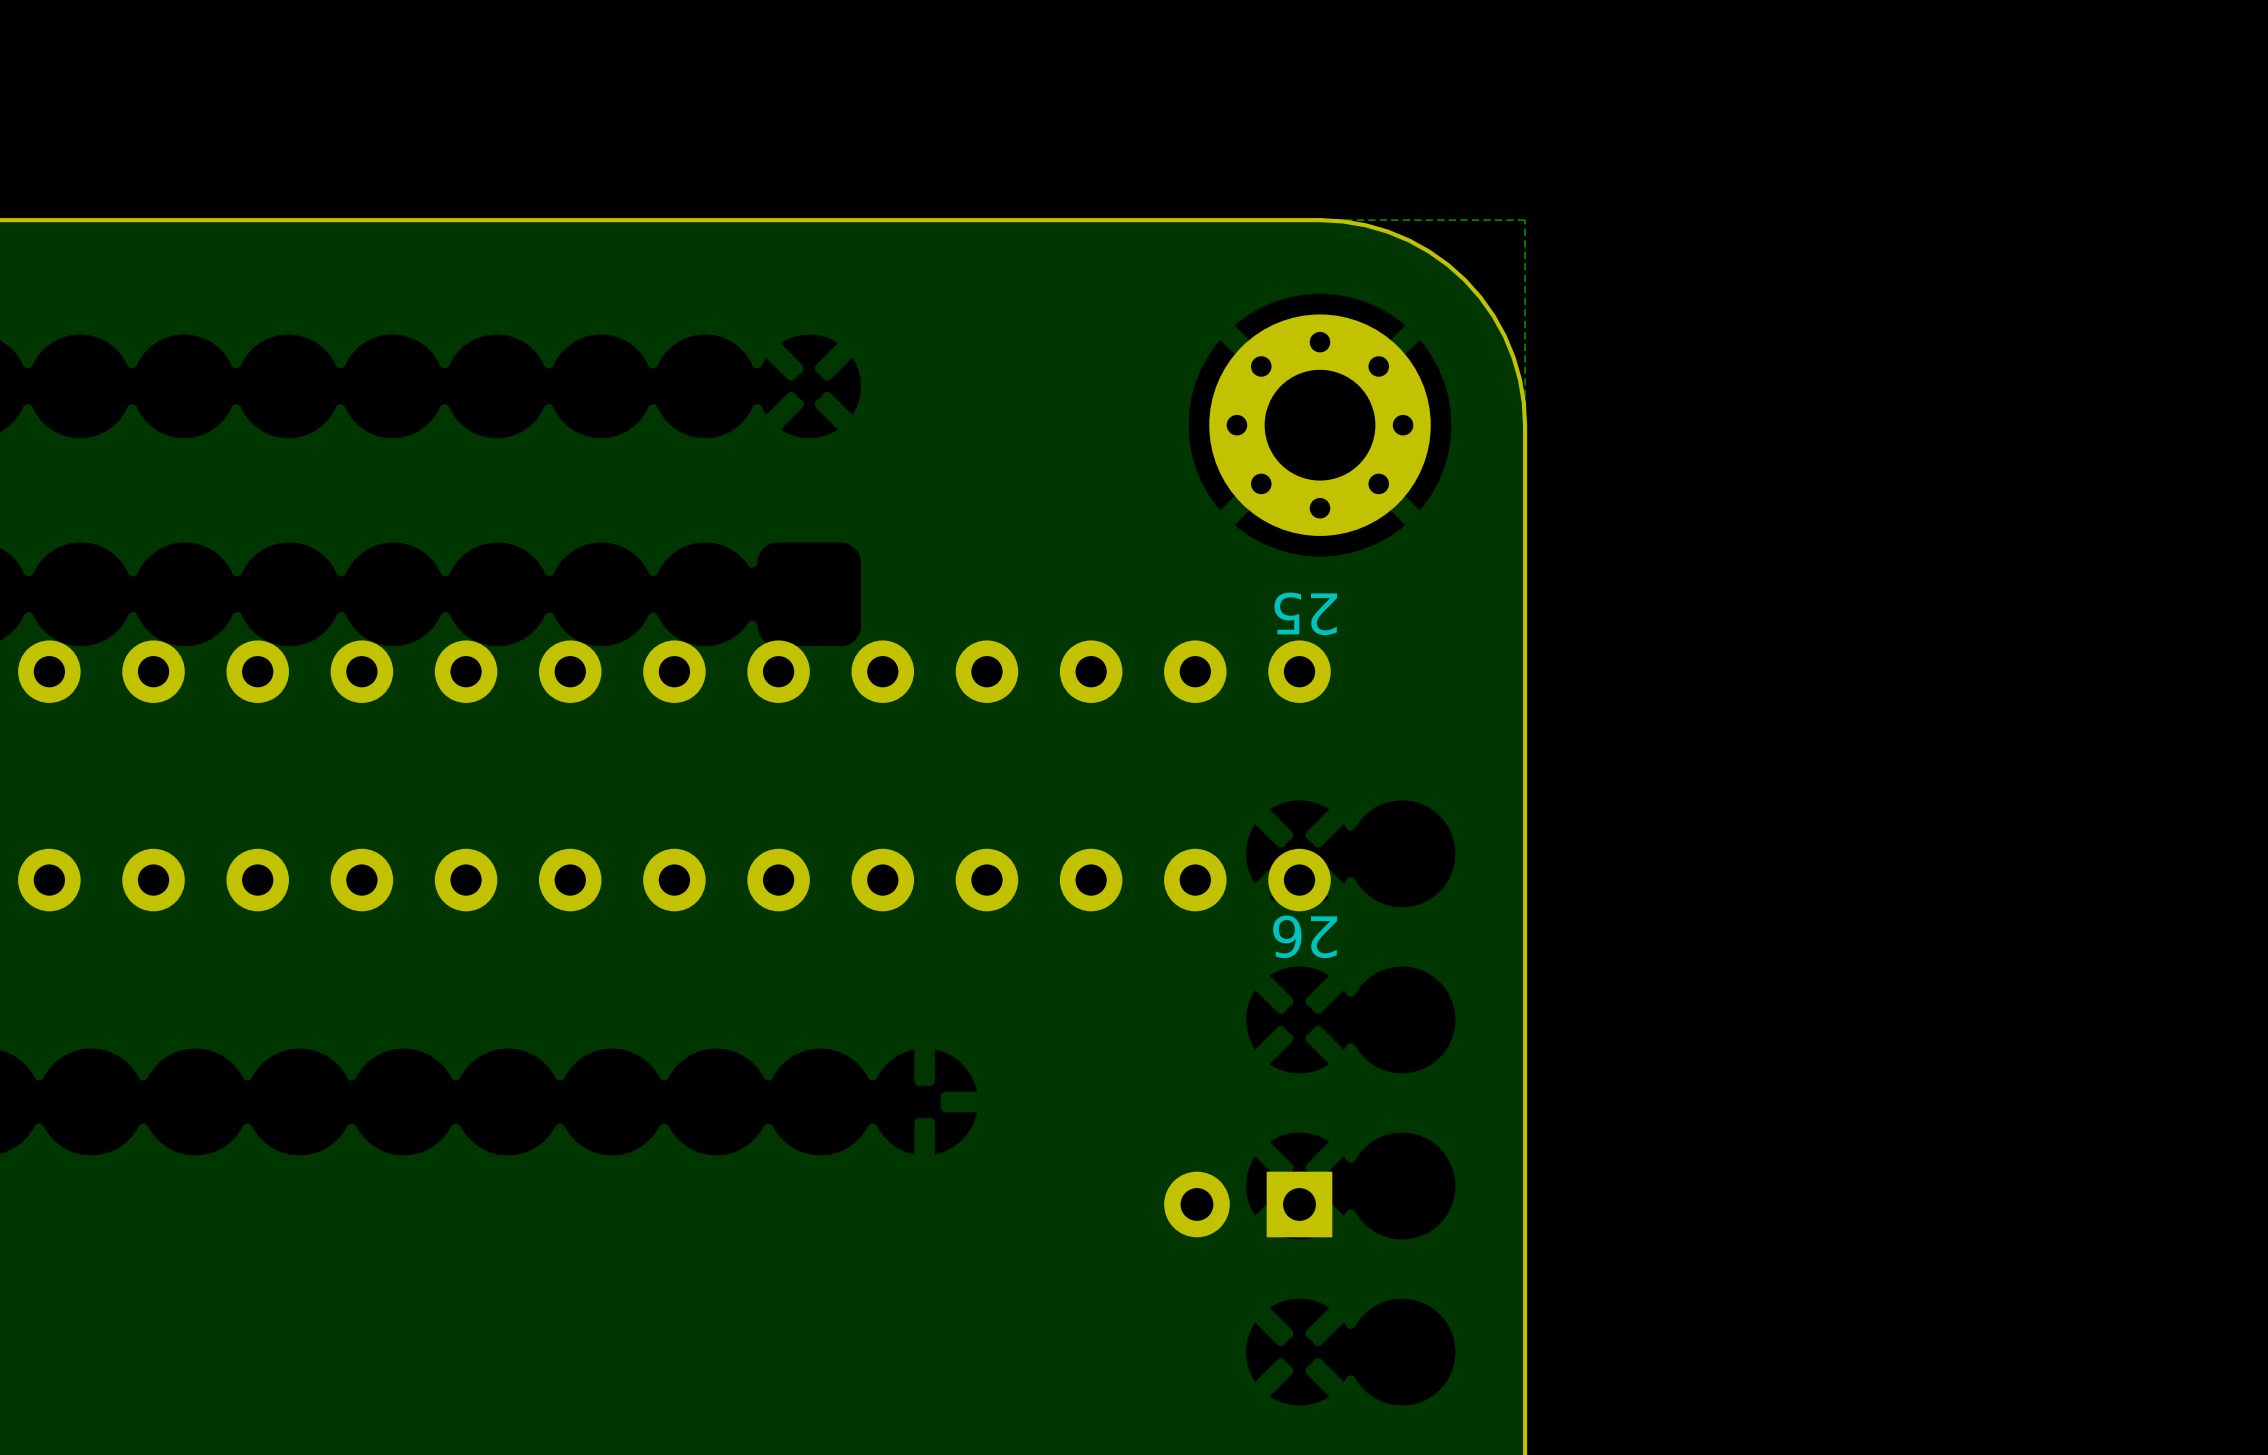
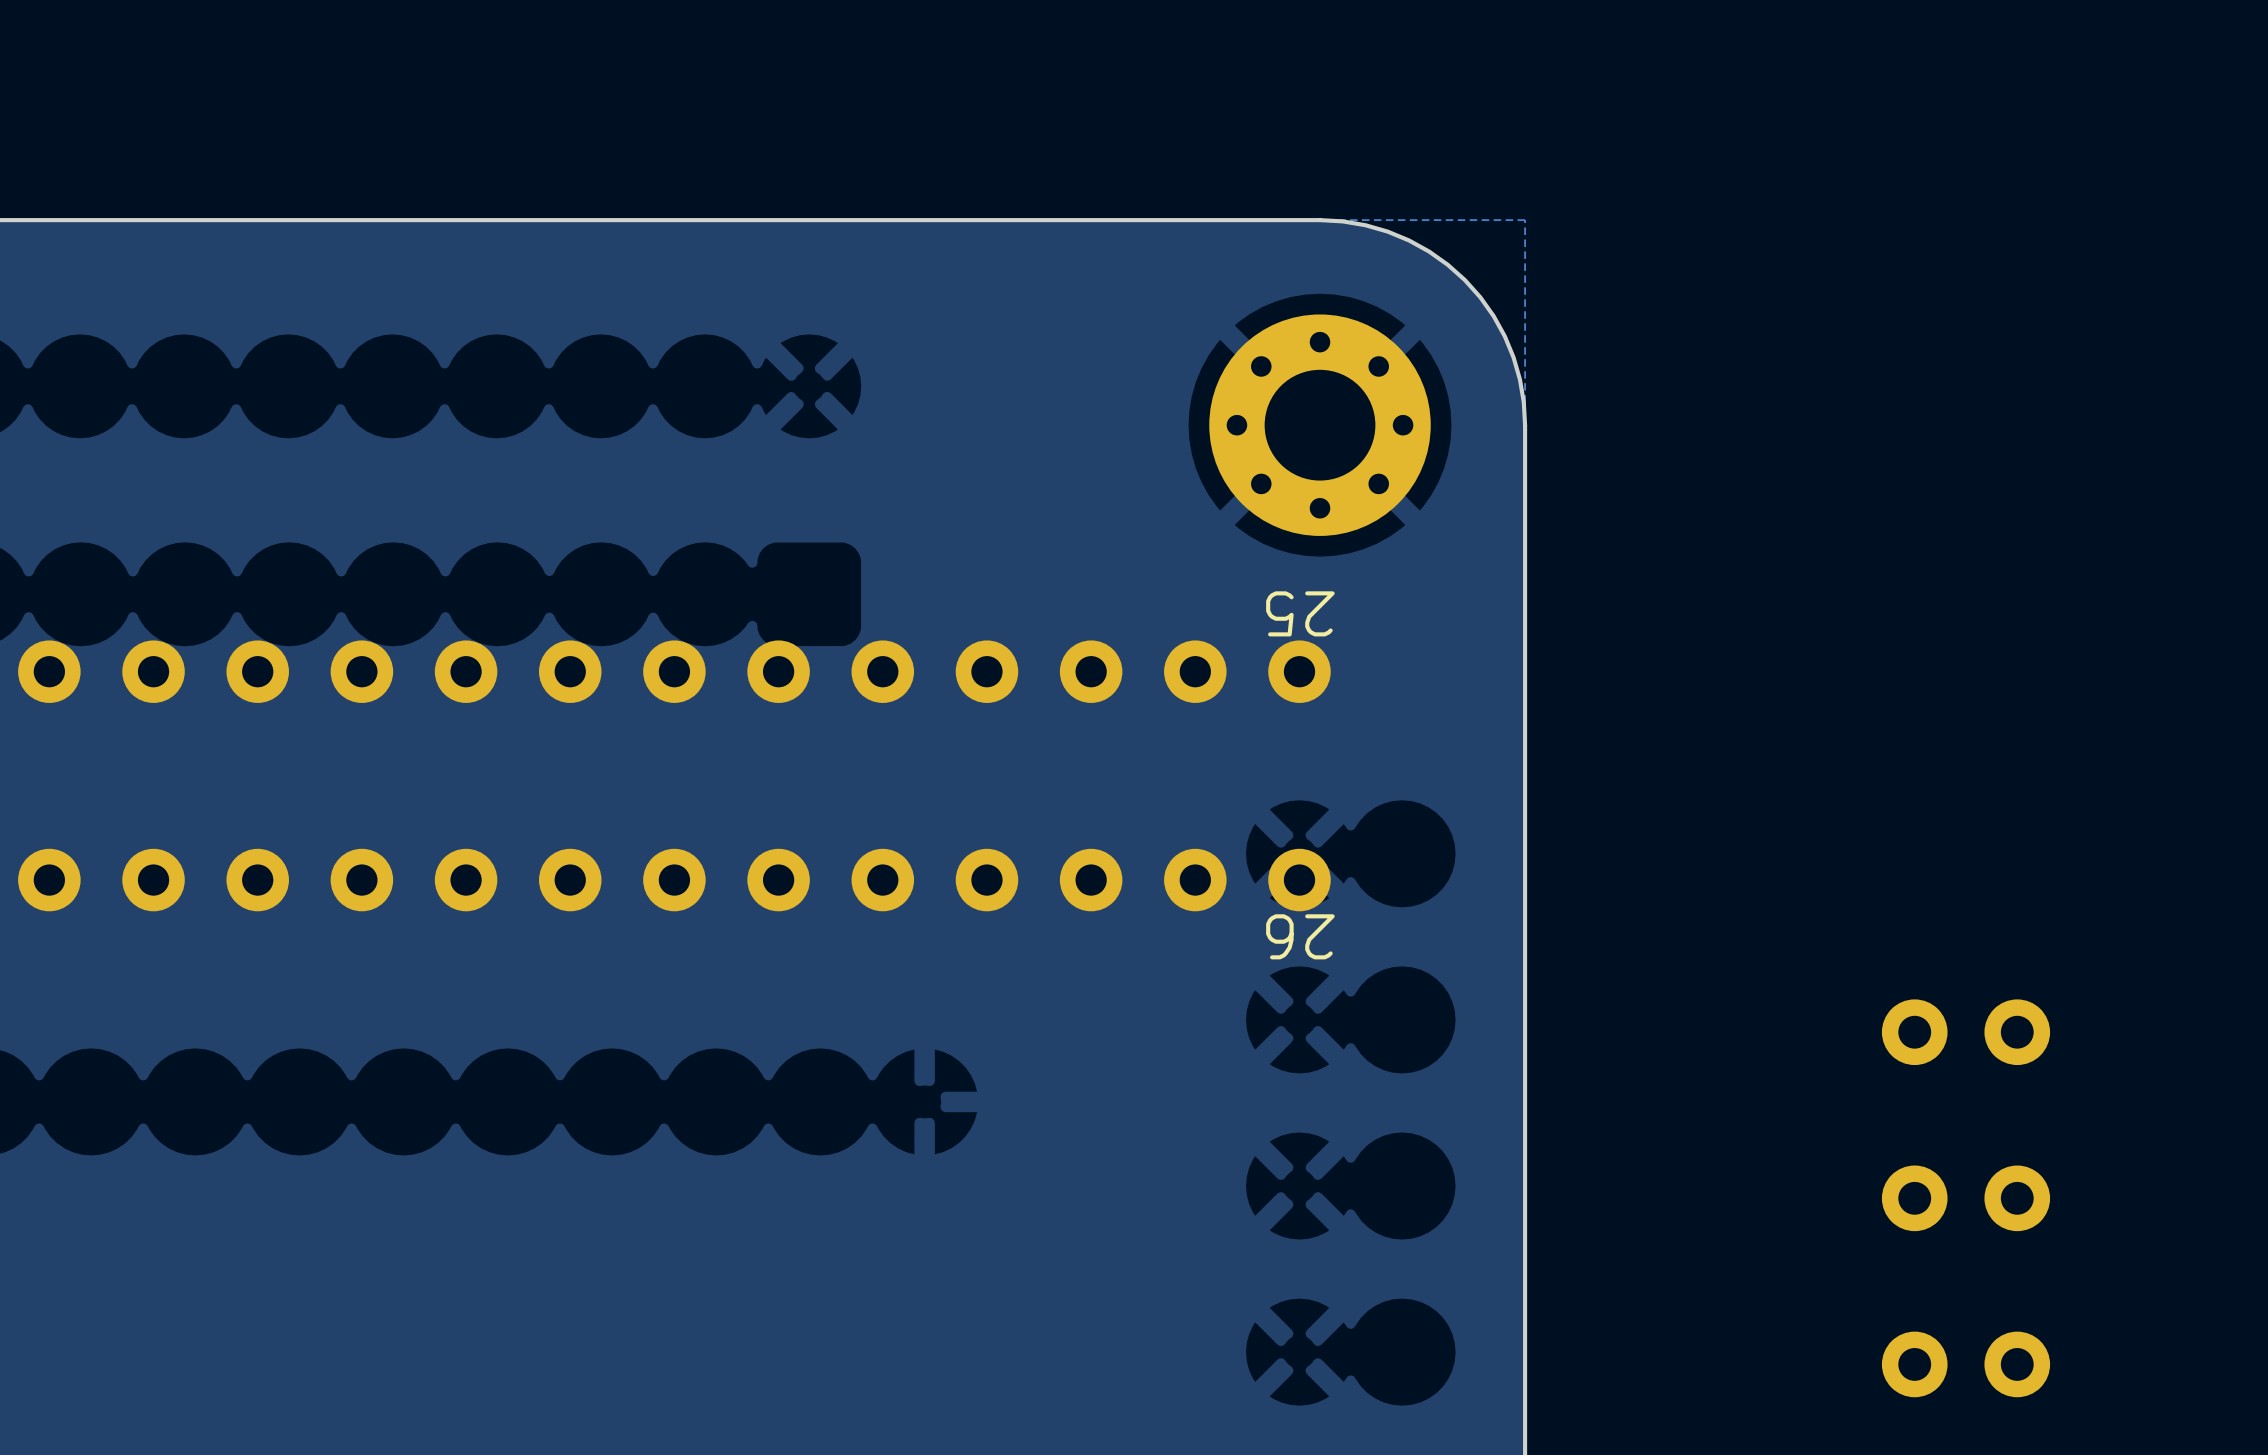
part: none -> (1965, 1032)
part: none -> (1965, 1198)
part: (1248, 1204) -> none
part: none -> (1965, 1364)

